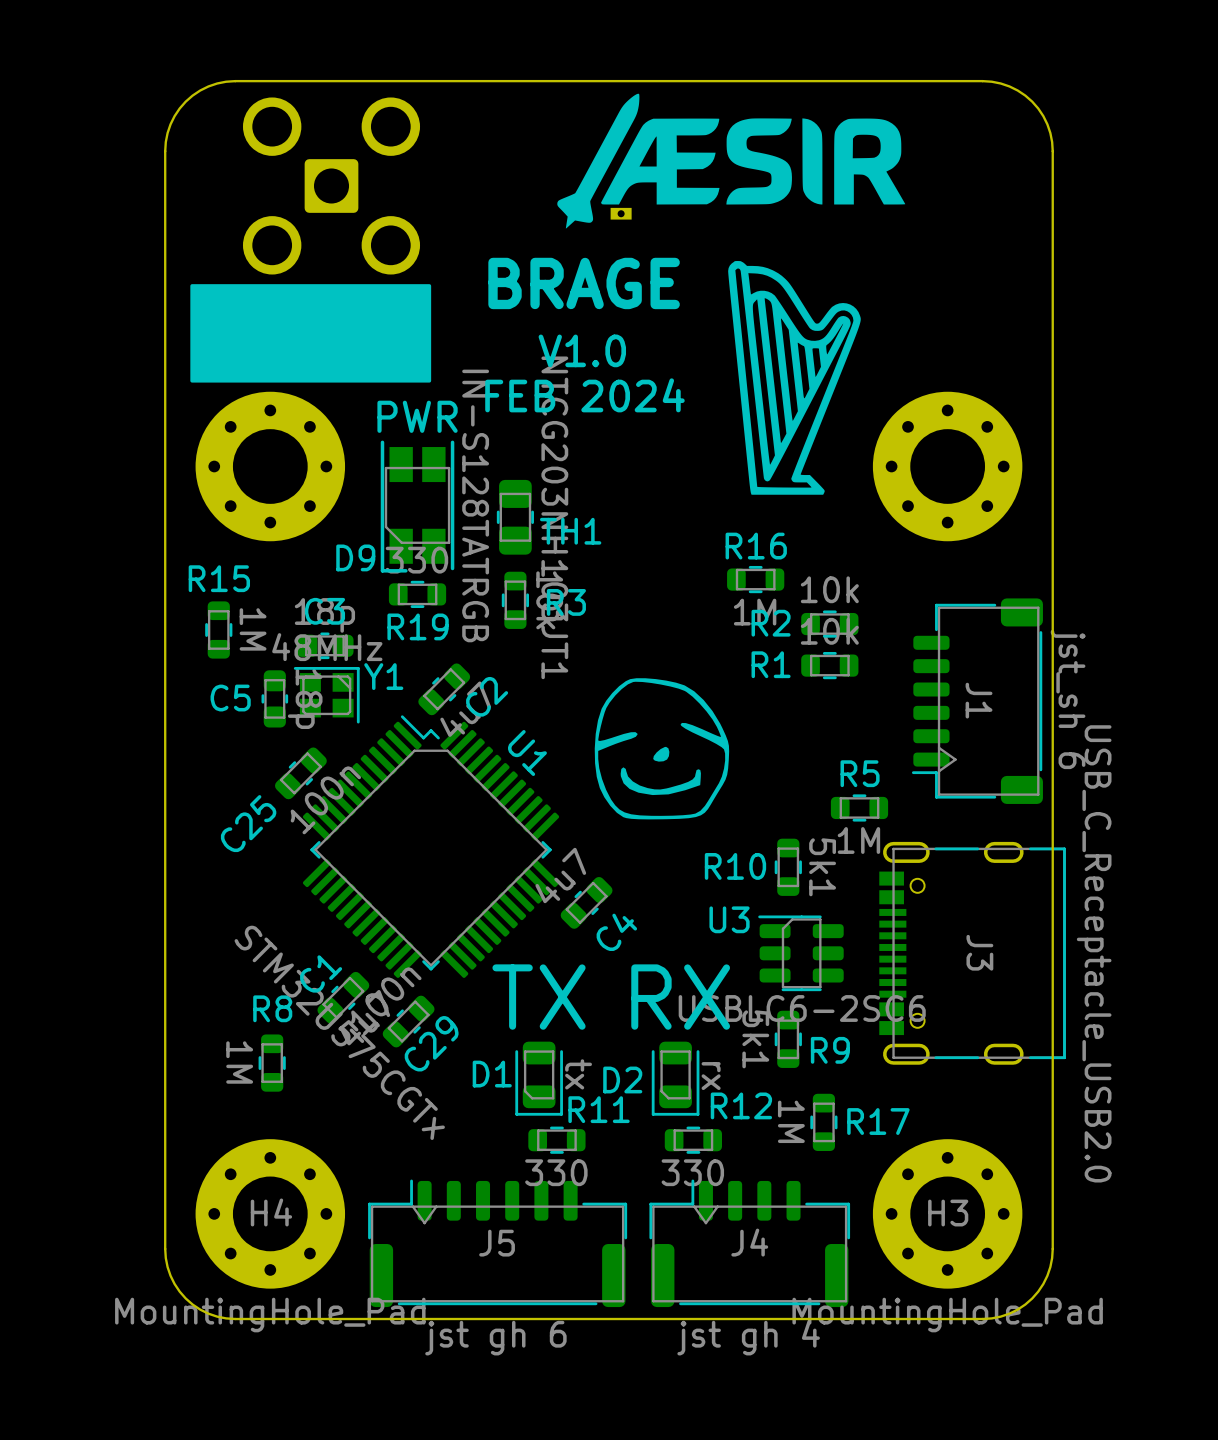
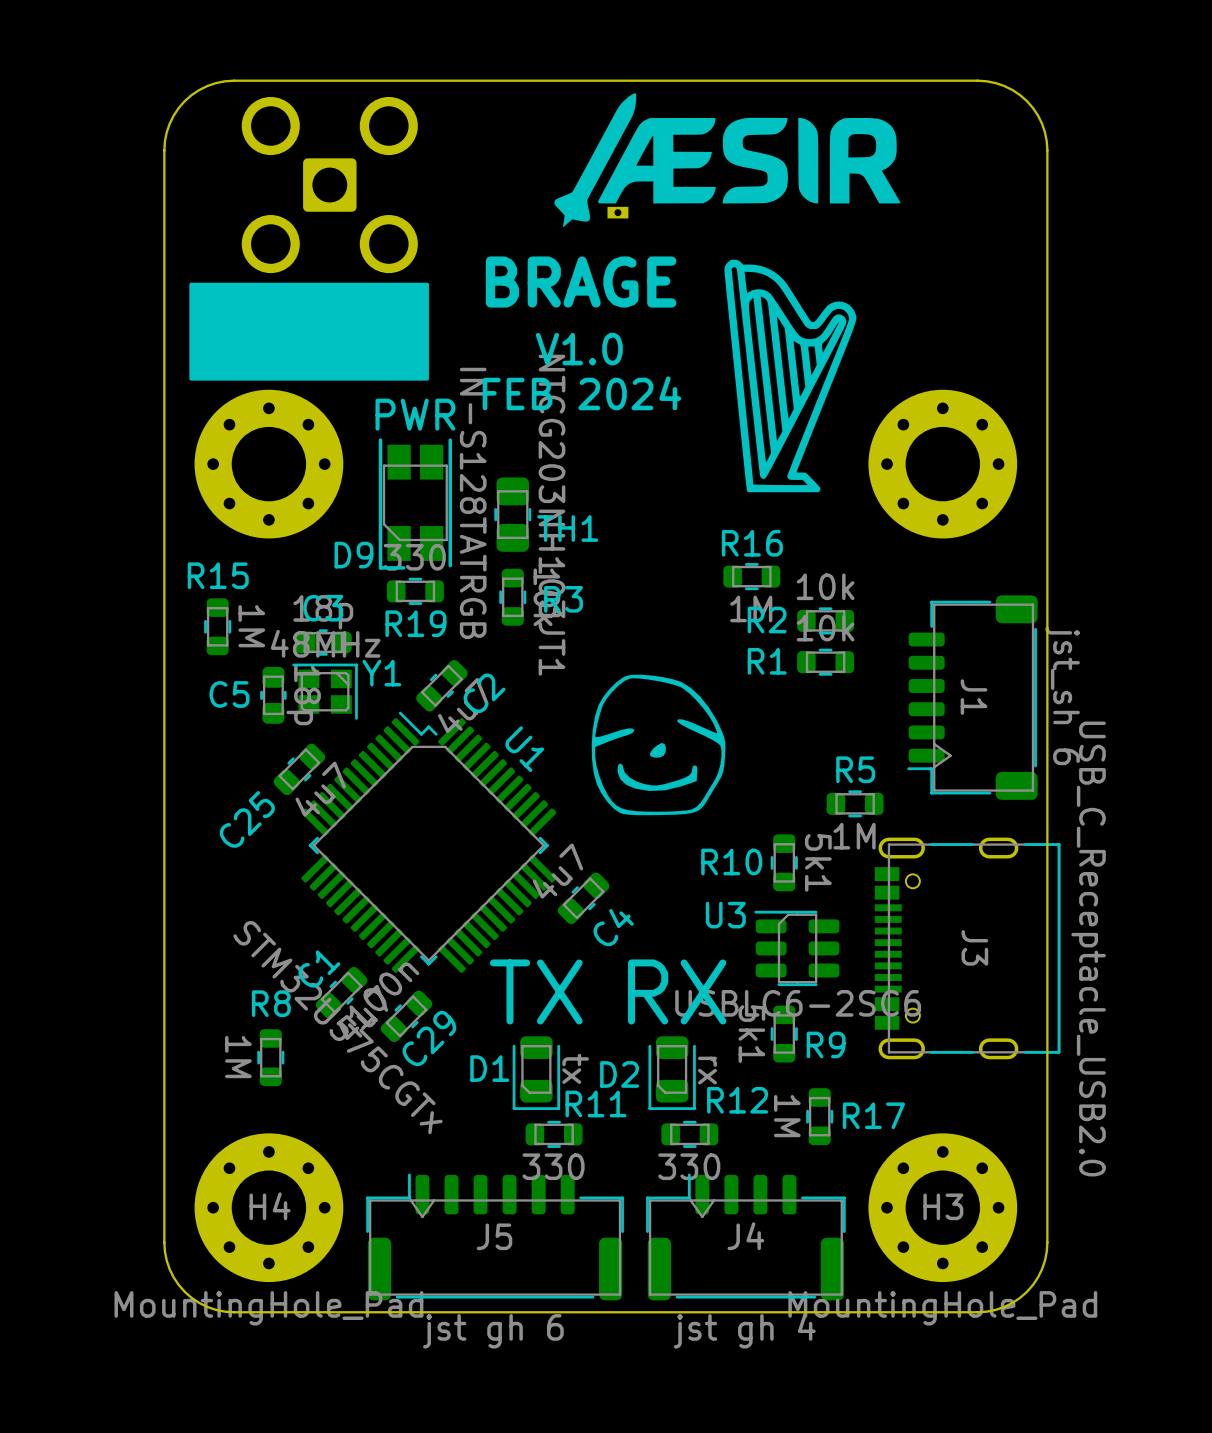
C25 value: 100n (325, 800) -> 4u7 (320, 789)

